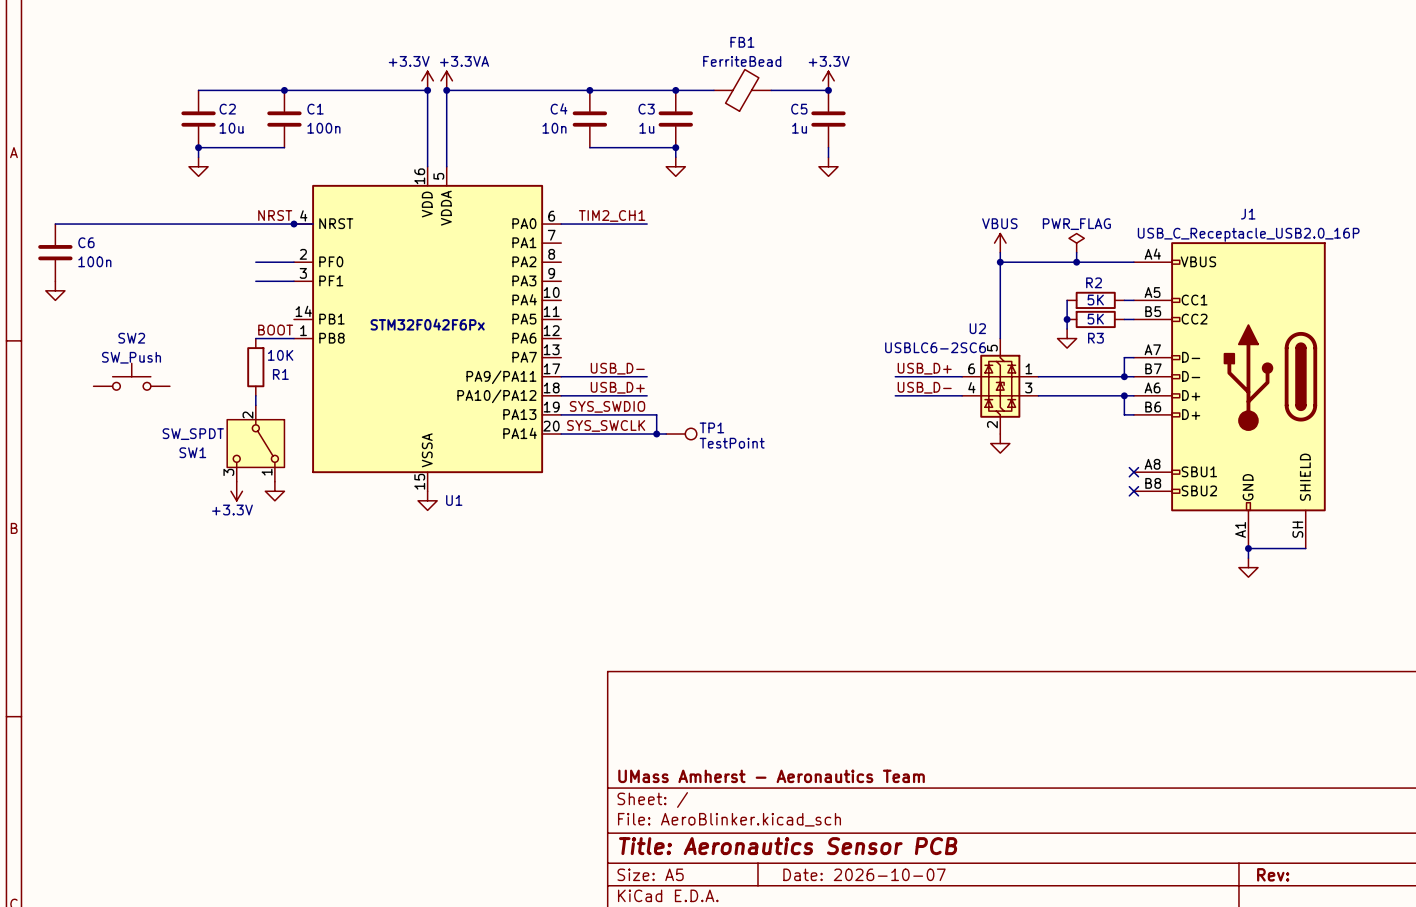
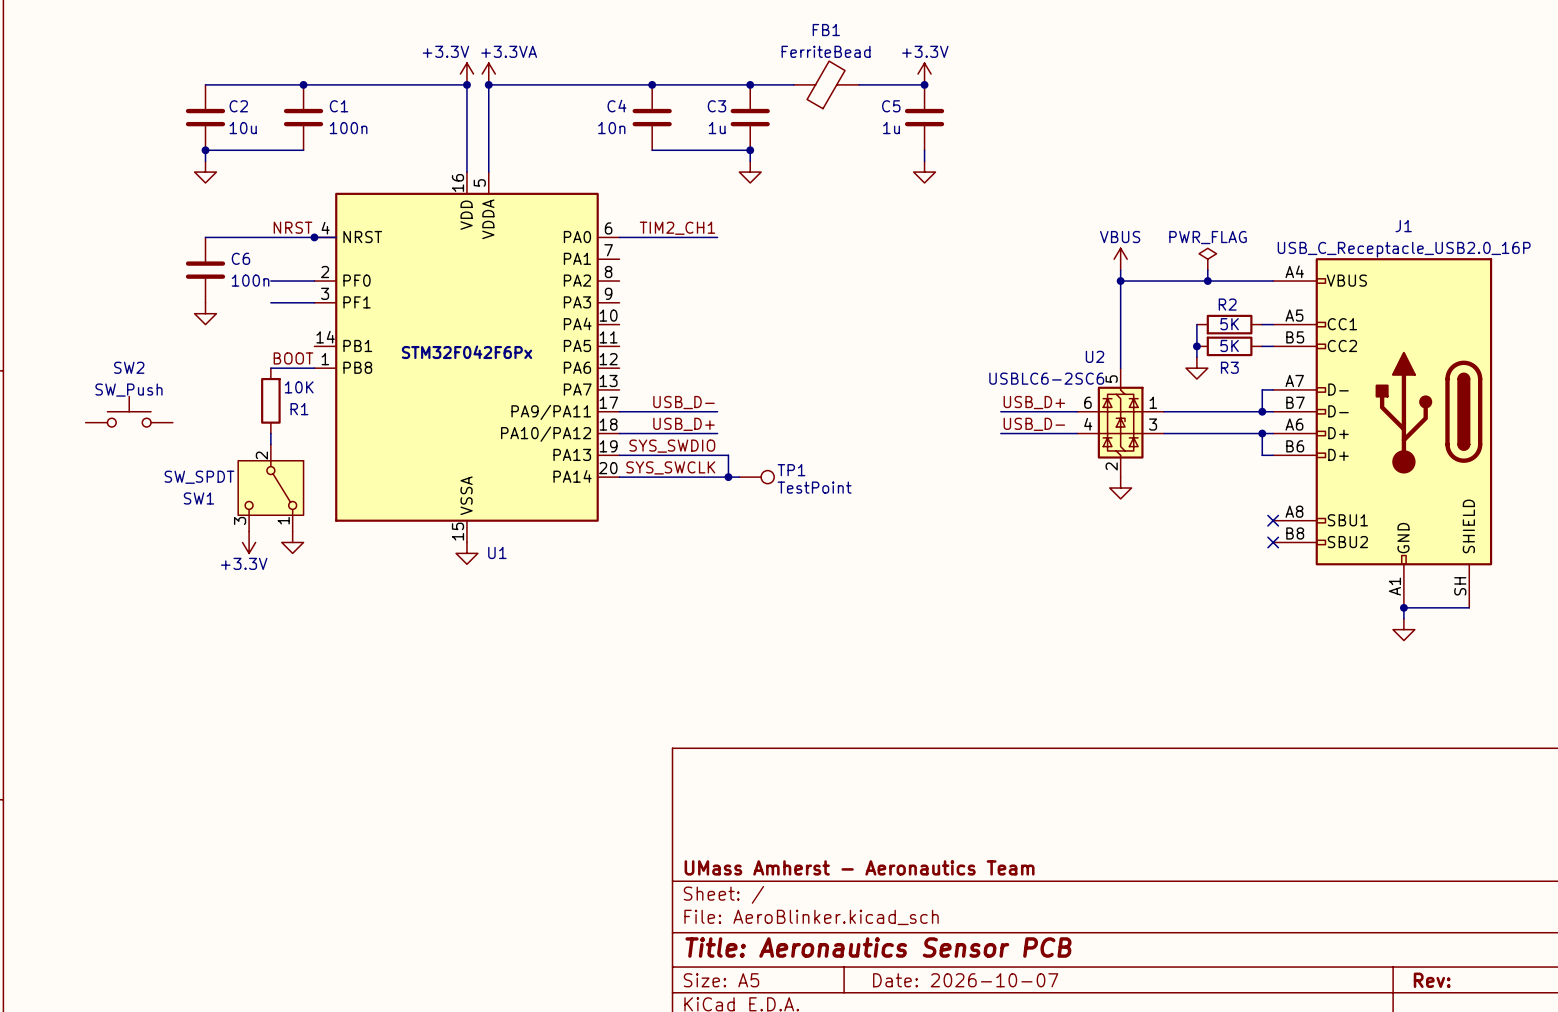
wire: (55, 224) (198, 224) -> none
C6 position: (55, 252) -> (205, 270)
power symbol position: (55, 290) -> (205, 313)

